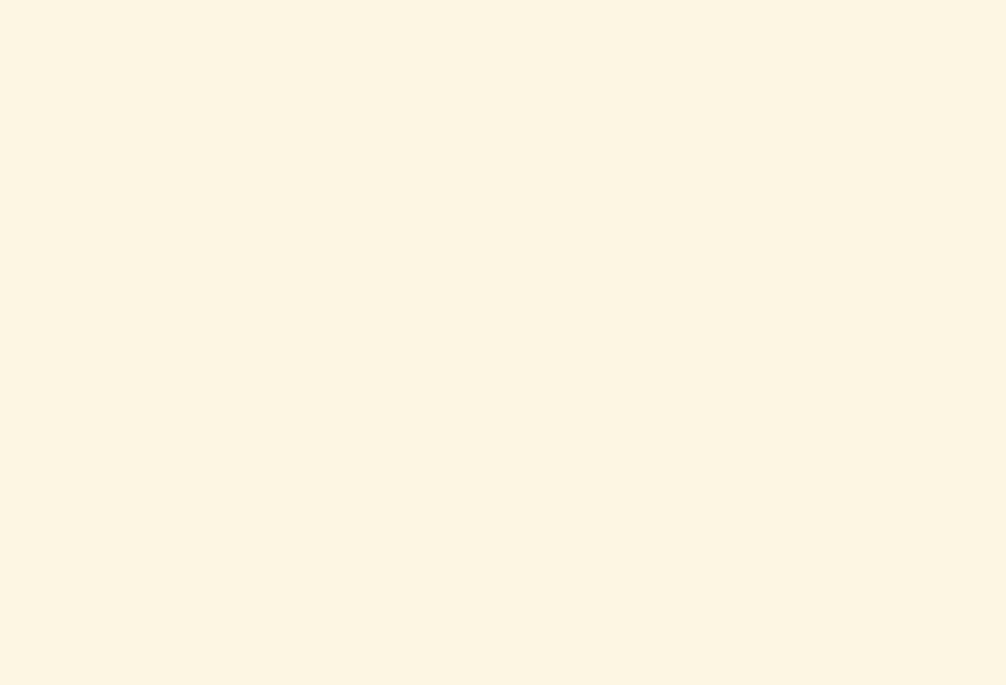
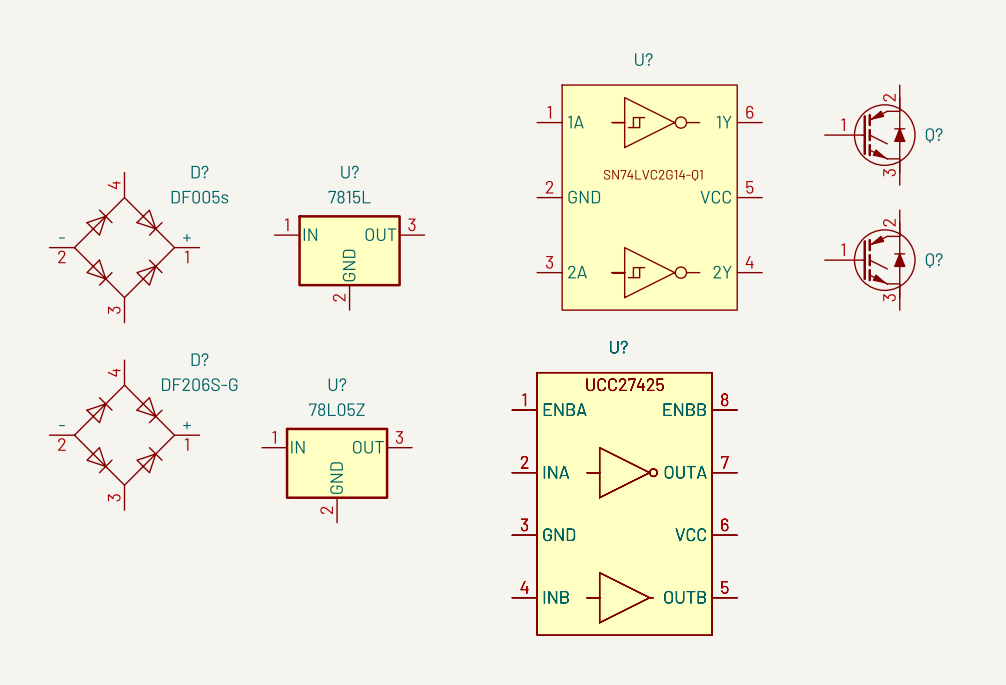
Q?: none -> (869, 135)
U?: none -> (649, 197)
D?: none -> DF005s (124, 247)
Q?: none -> (869, 260)
U?: none -> 7815L (349, 262)
D?: none -> DF206S-G (124, 435)
U?: none -> 78L05Z (337, 475)
U?: none -> (624, 503)

